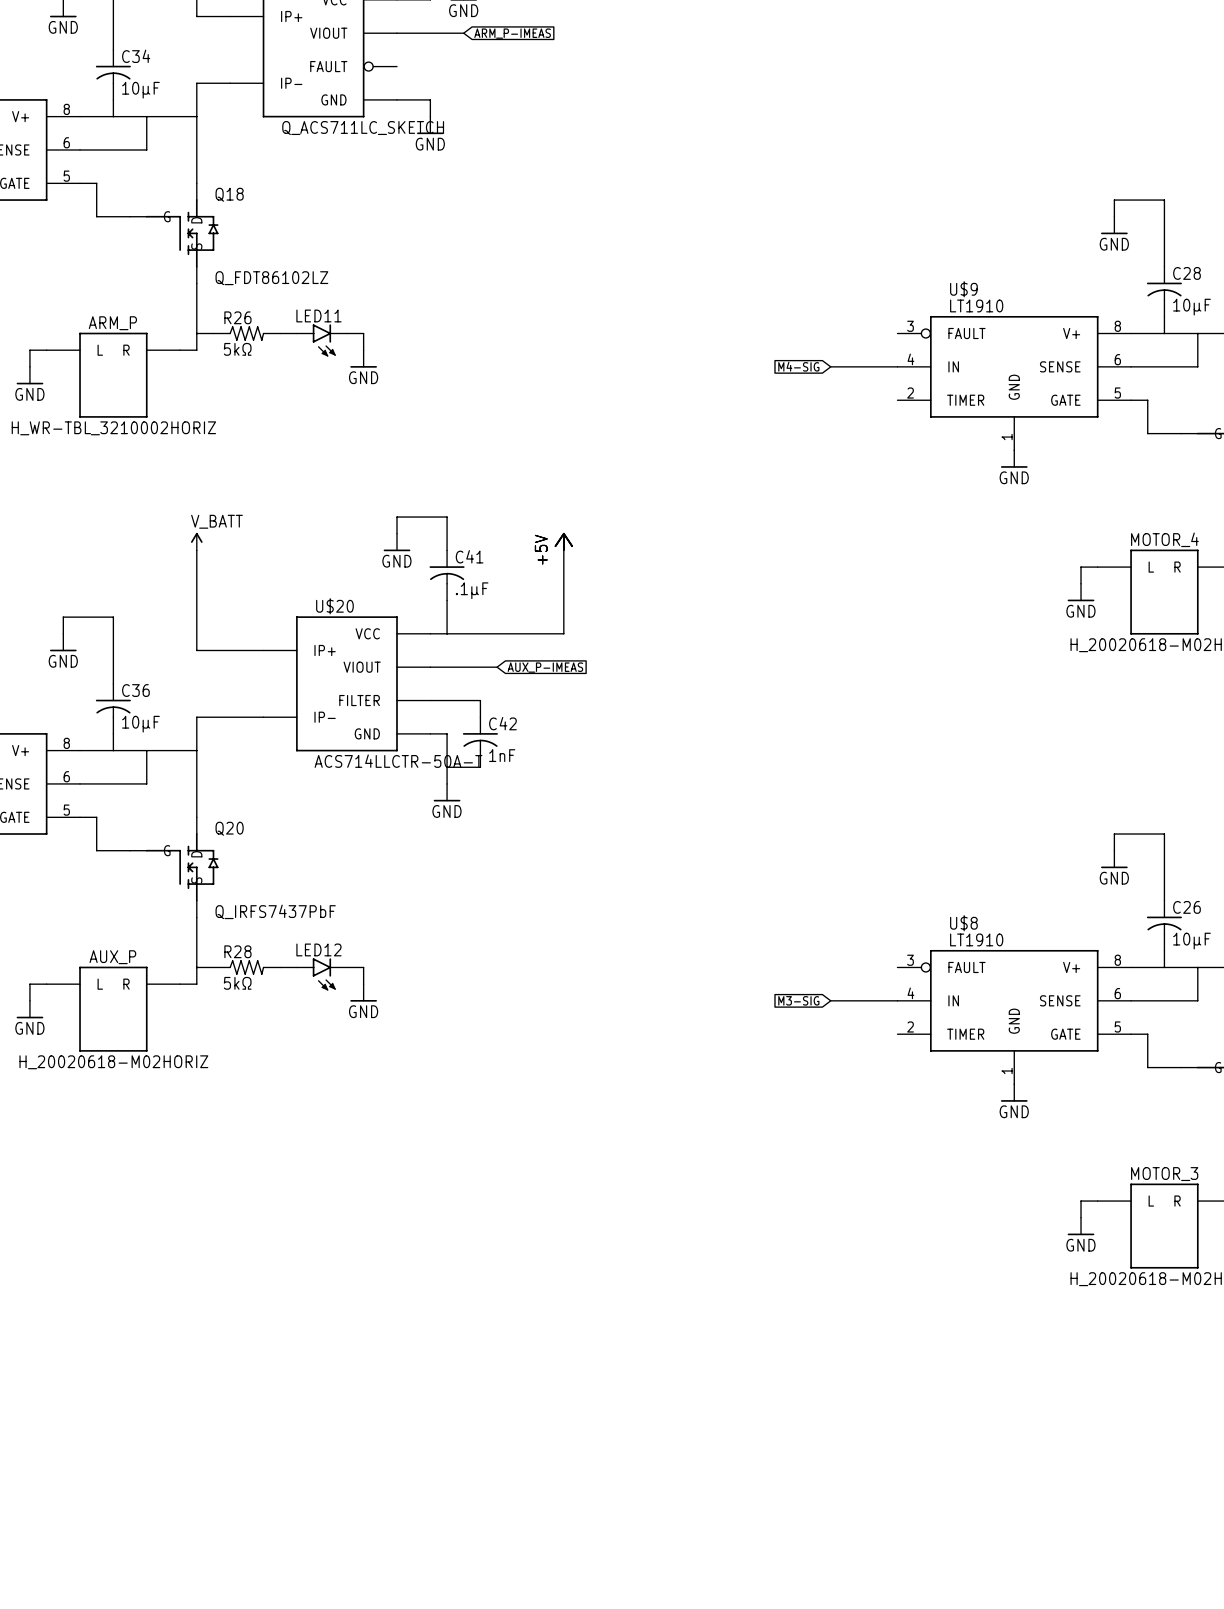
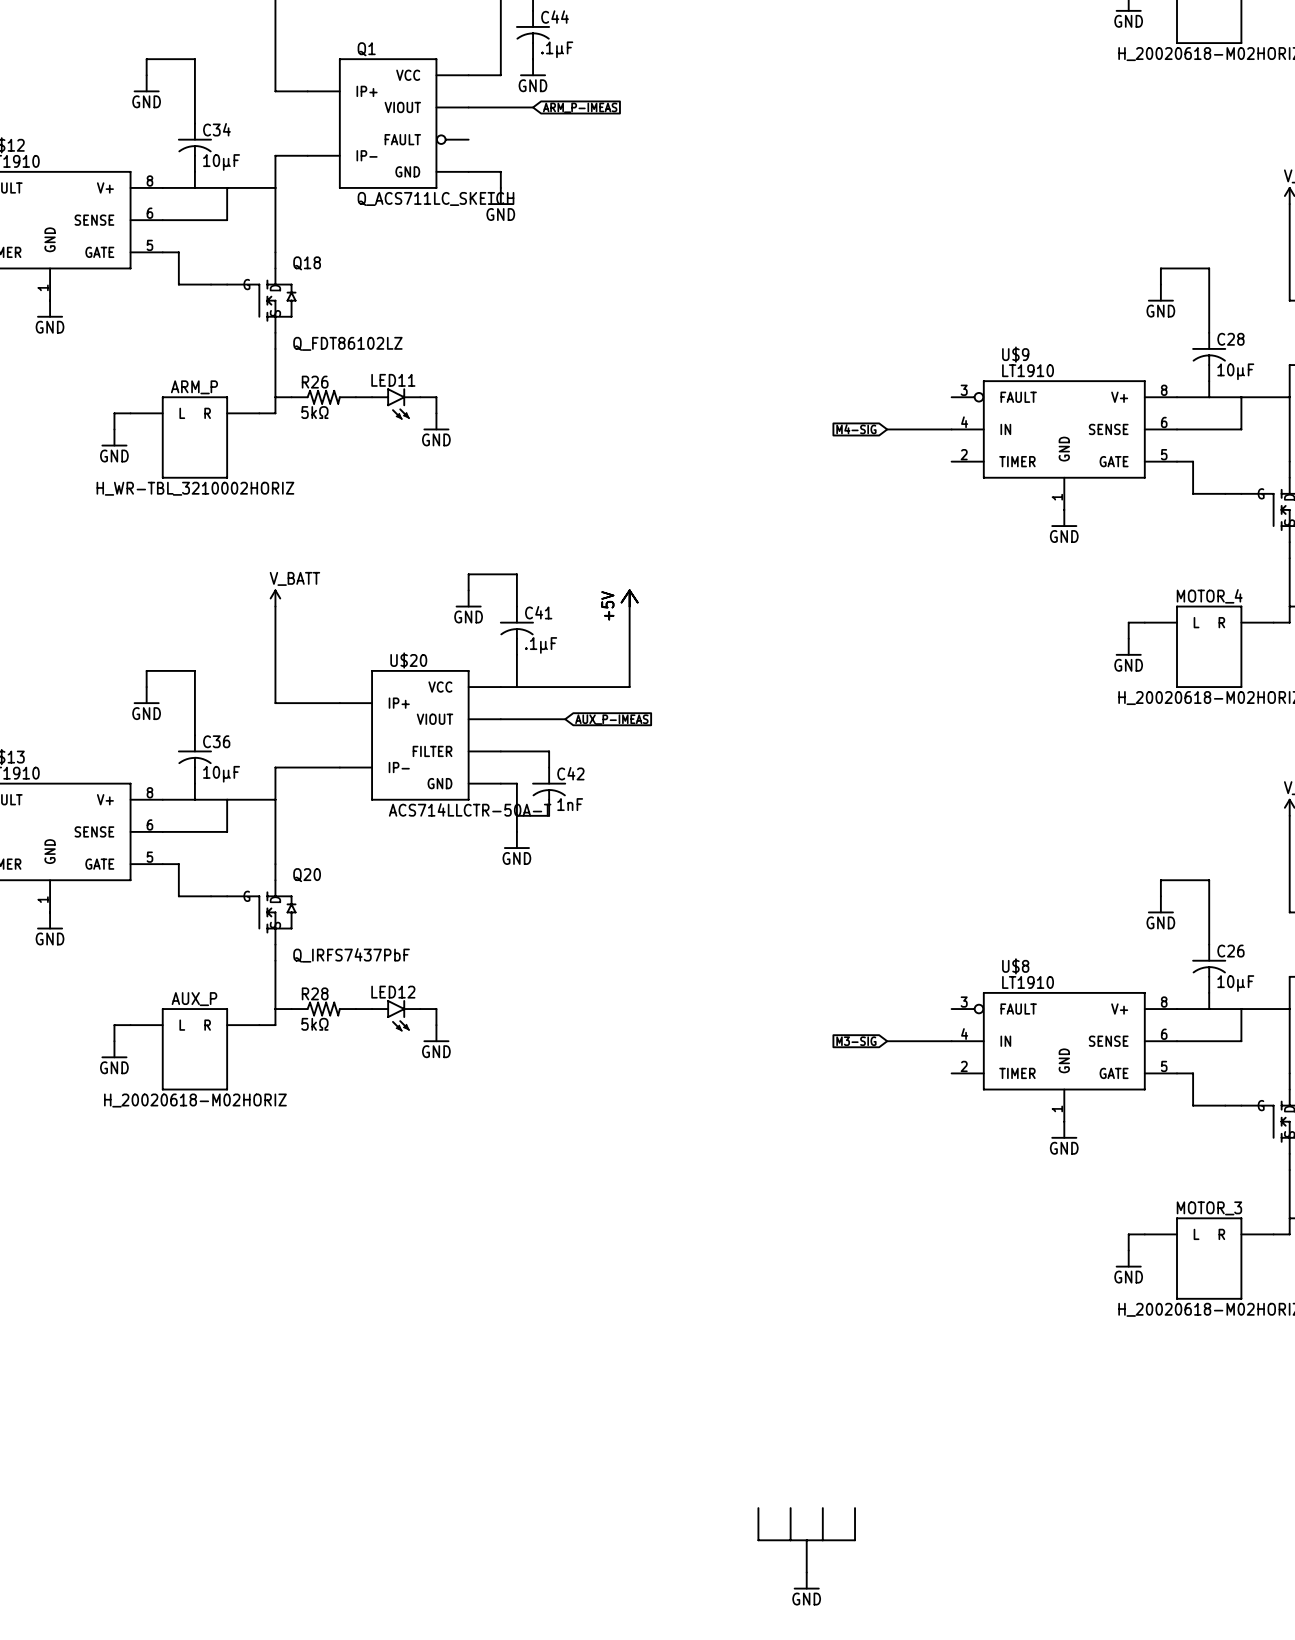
wire: none -> (758, 1508) (758, 1540) (855, 1540) (855, 1508)
wire: none -> (790, 1508) (790, 1540)
wire: none -> (822, 1508) (822, 1540)
wire: none -> (806, 1540) (806, 1572)
power symbol: none -> GND (806, 1580)

